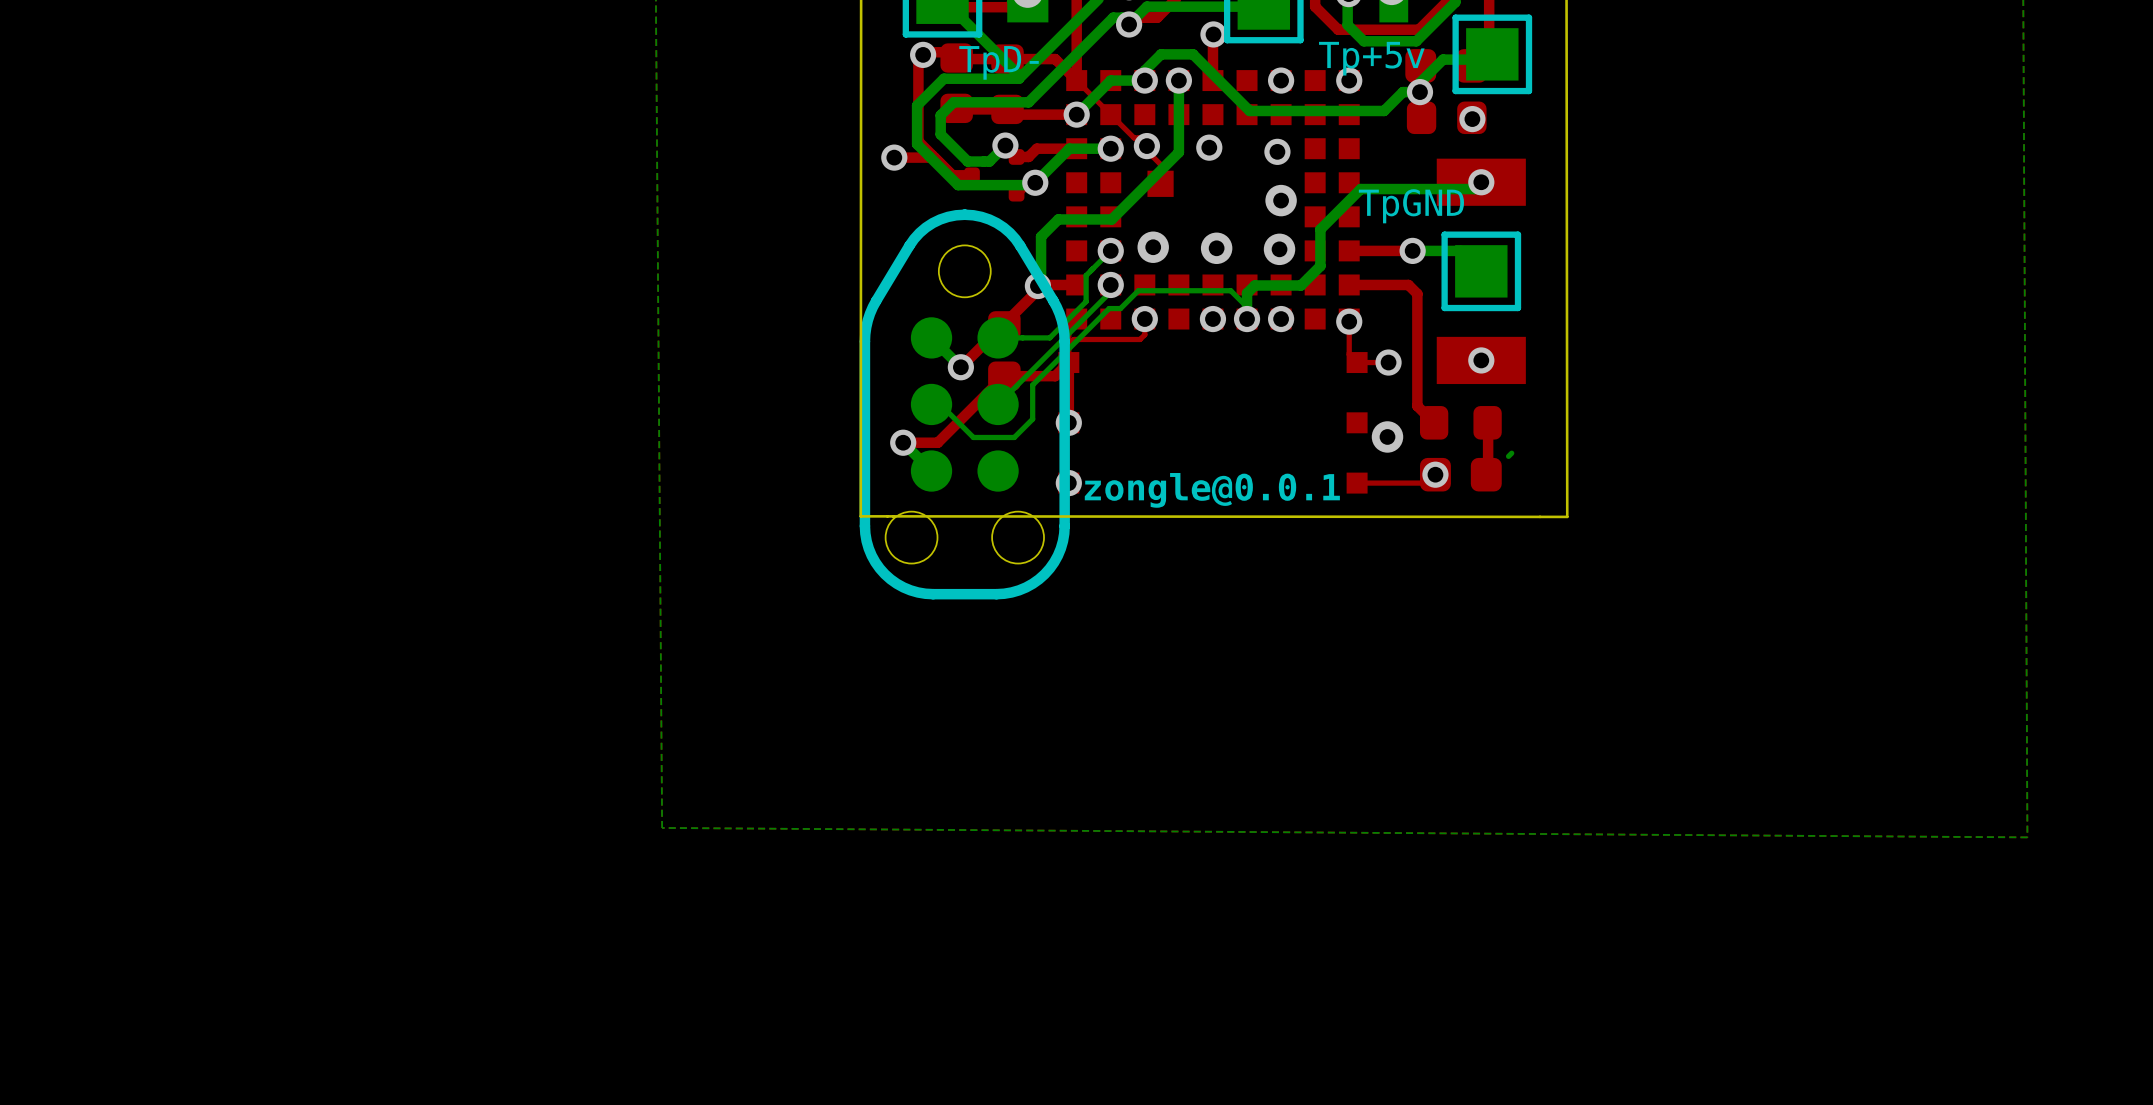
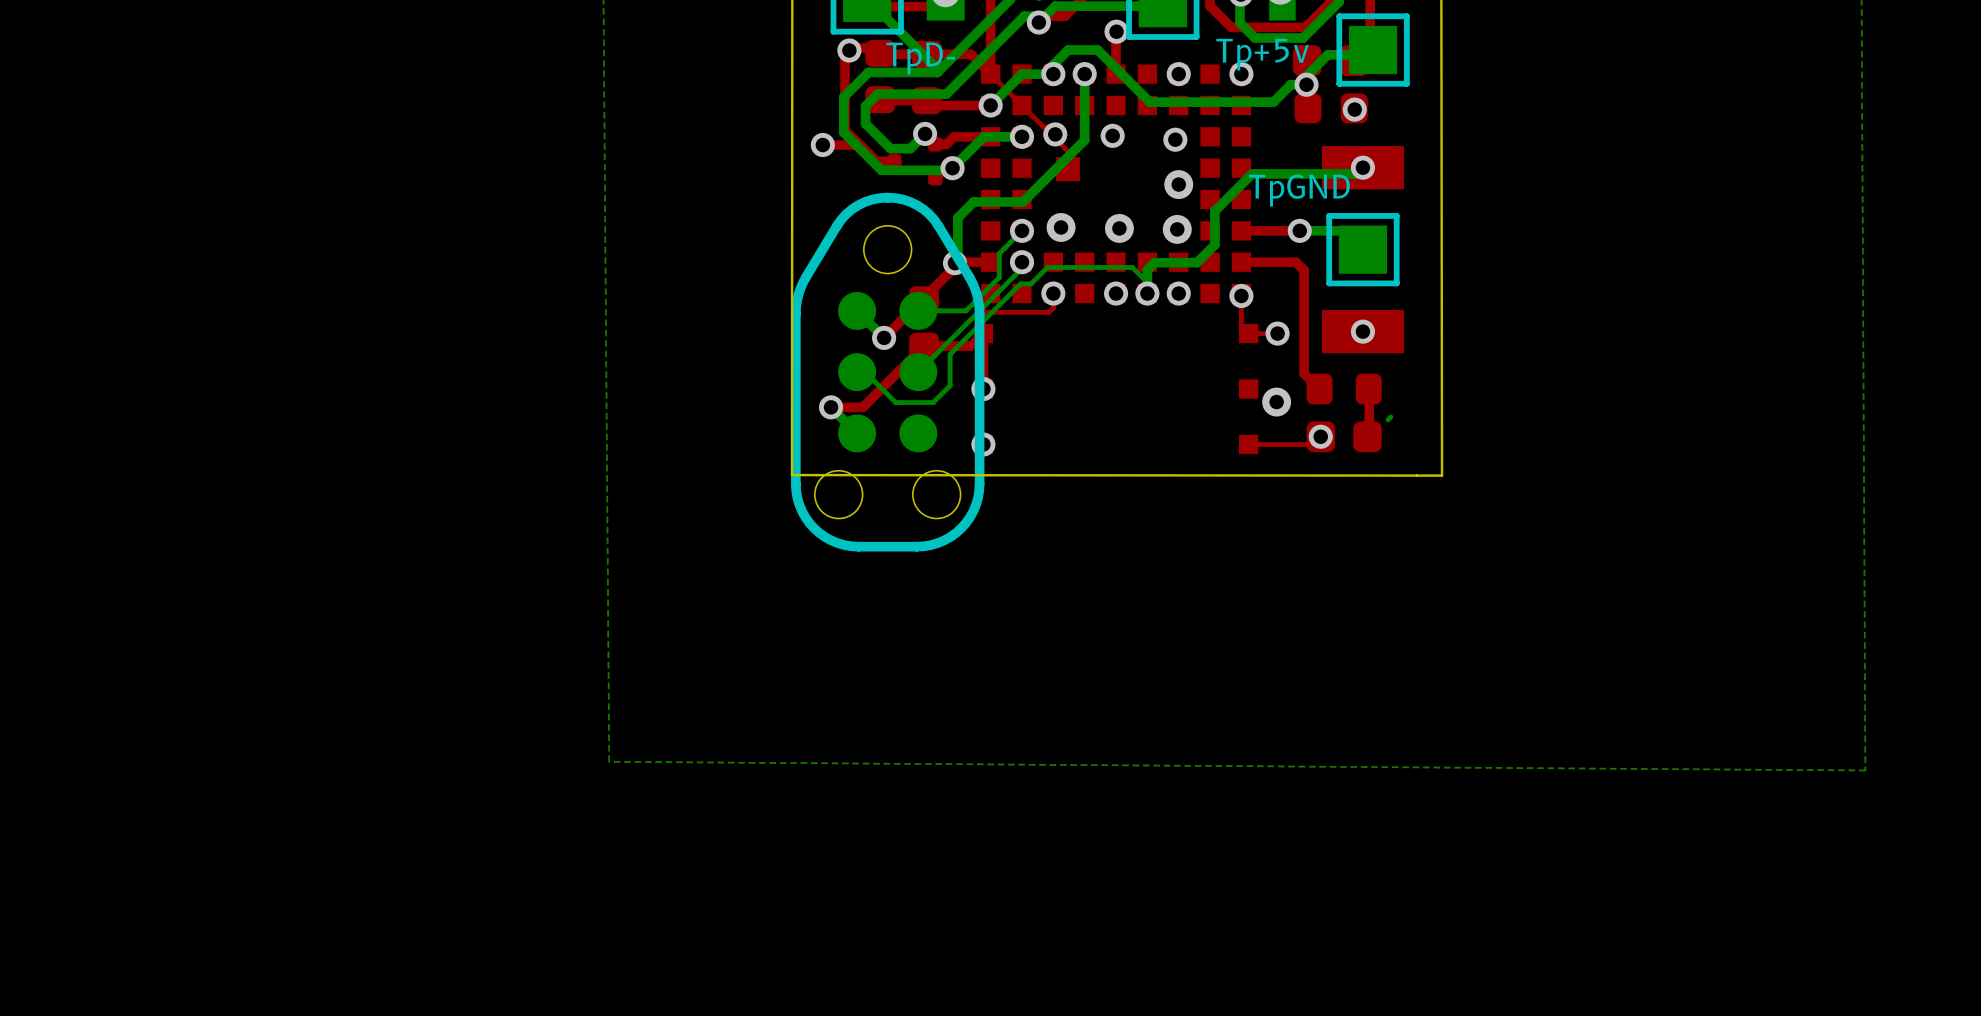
text: zongle@0.0.1 (1212, 490) -> none

